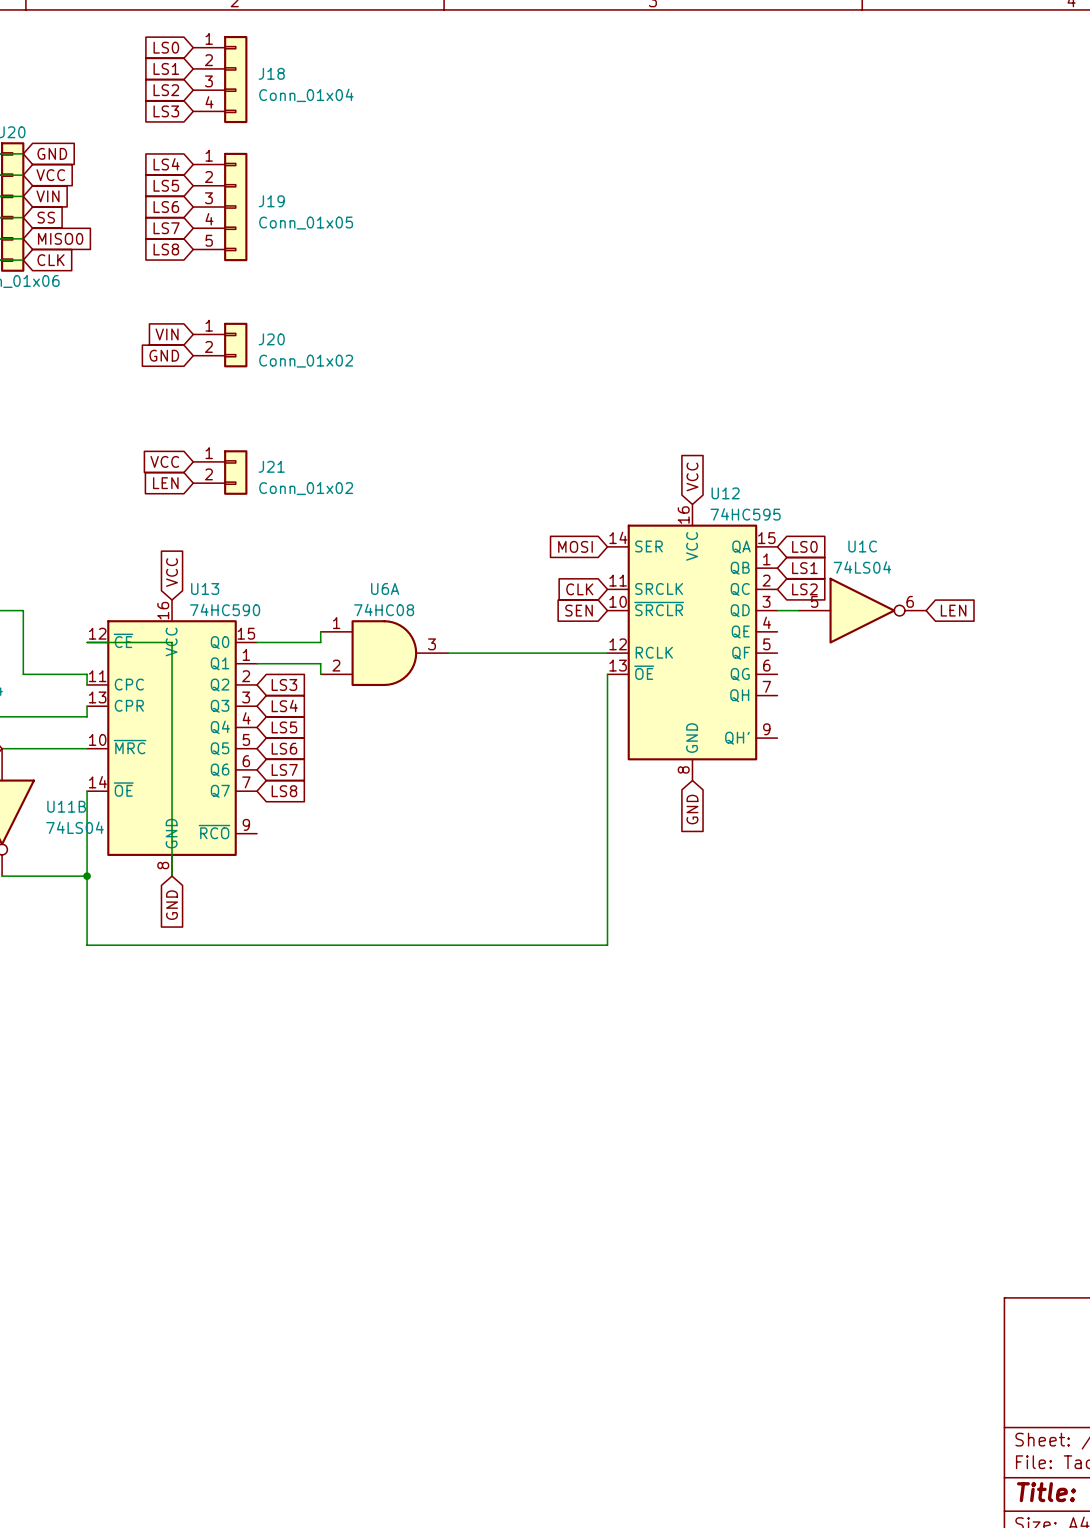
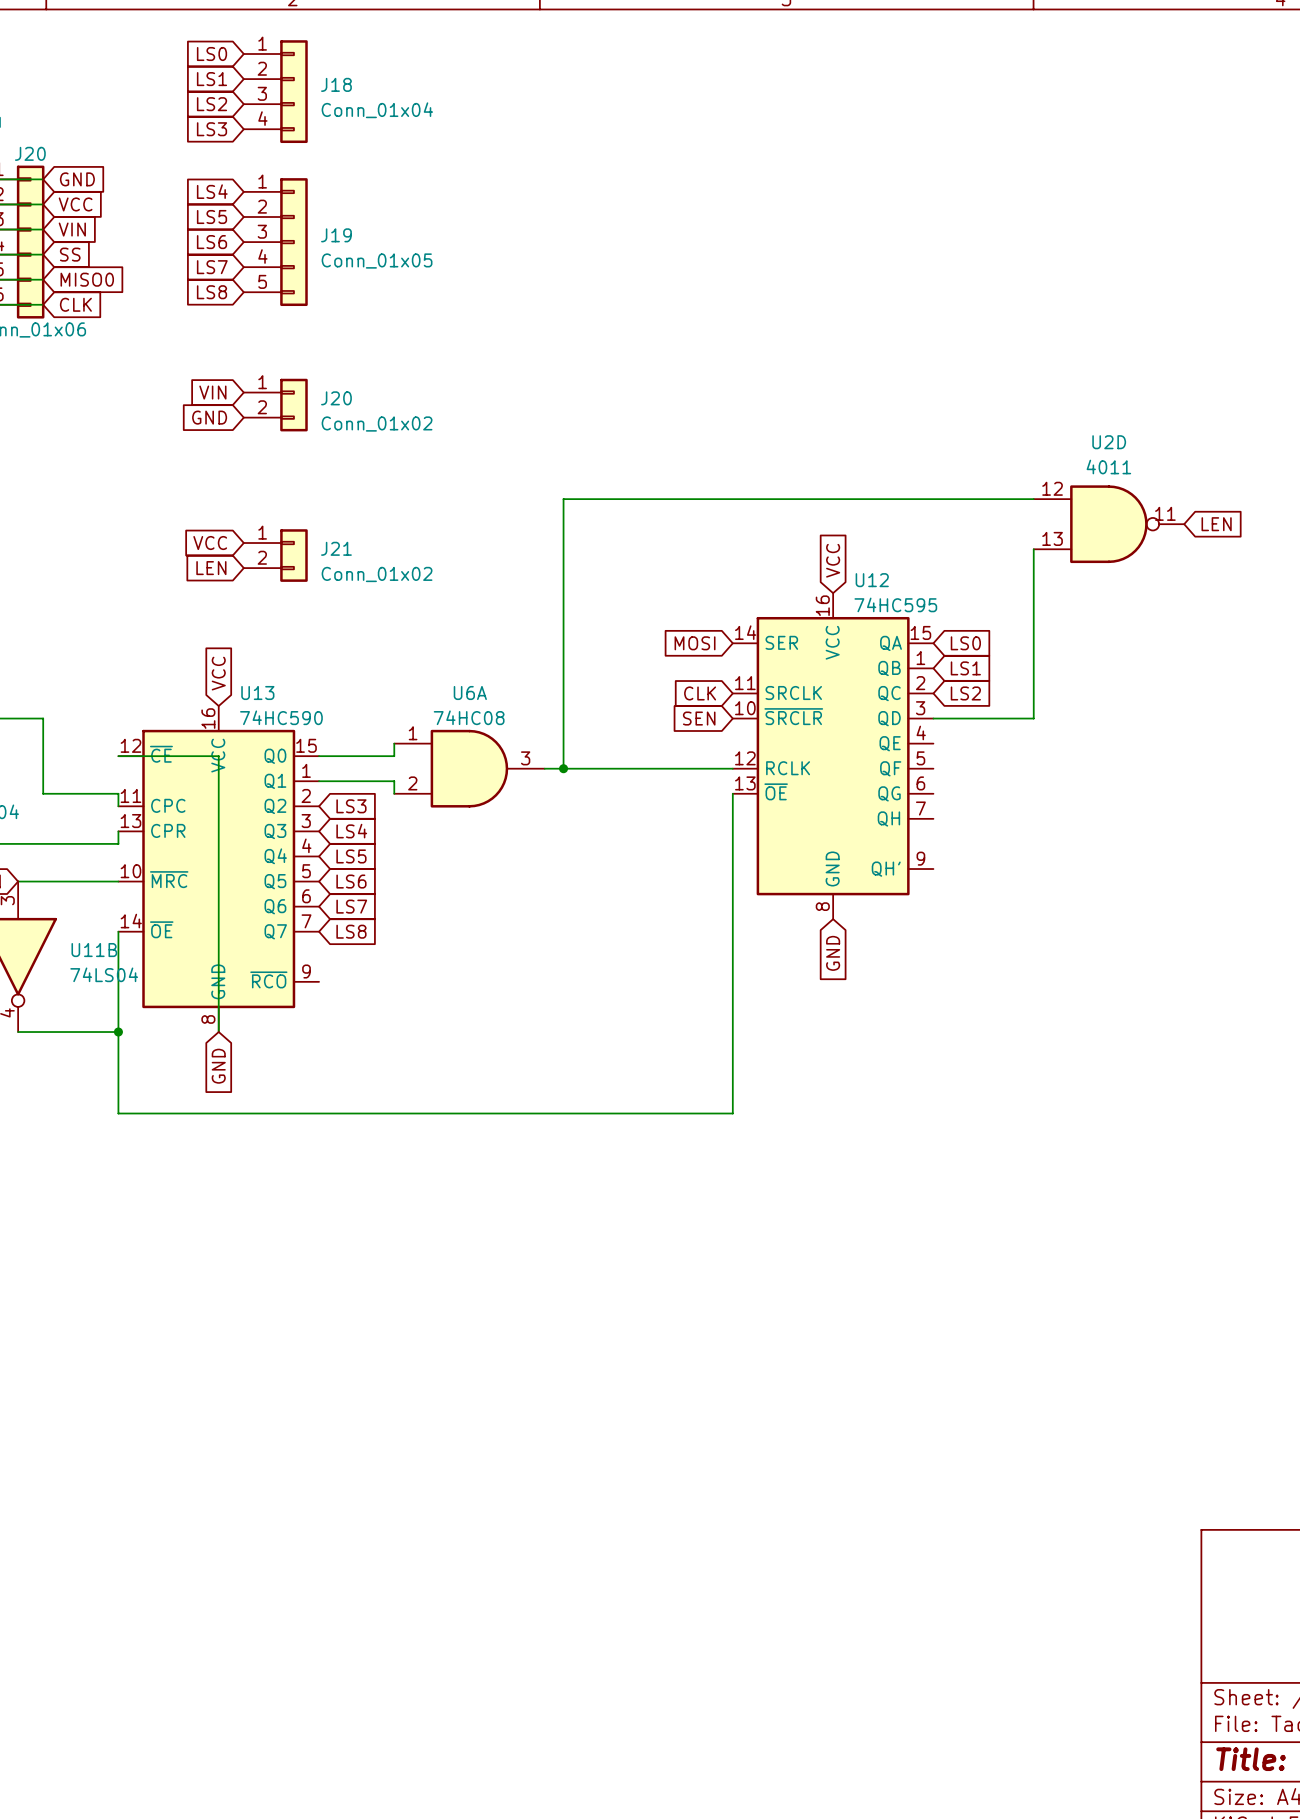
wire: none -> (1033, 499) (563, 499) (563, 768)
U2D: none -> 4011 (1108, 524)
wire: none -> (1033, 549) (1033, 718) (958, 718)
U1C: 74LS04 (862, 610) -> none
global label position: LEN (953, 610) -> LEN (1216, 524)
junction: none -> (563, 768)

